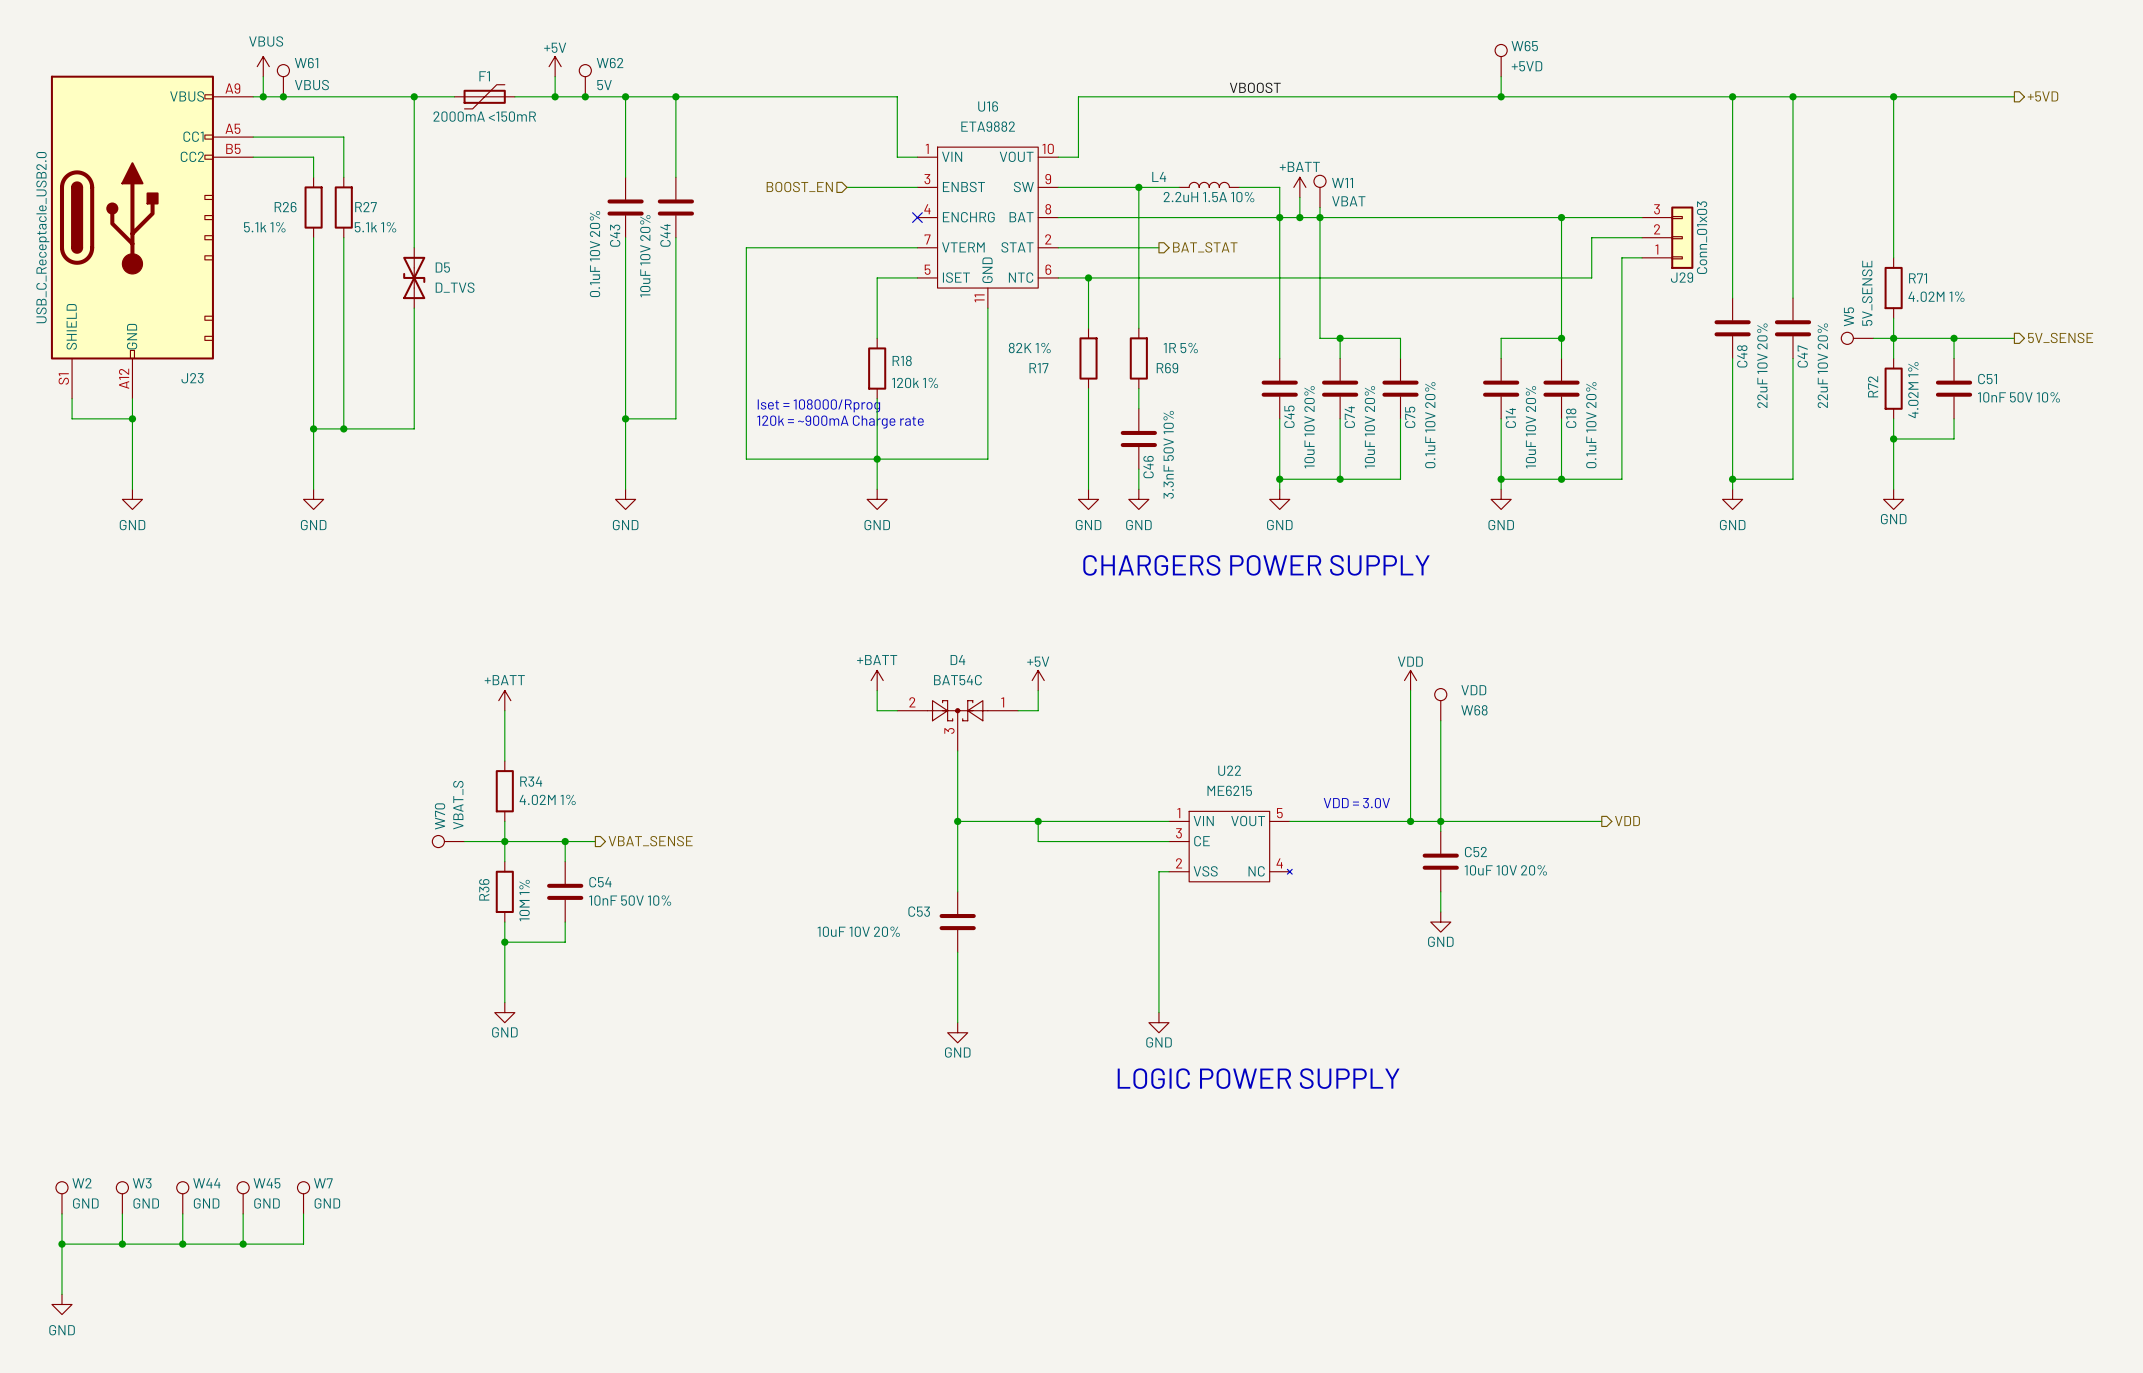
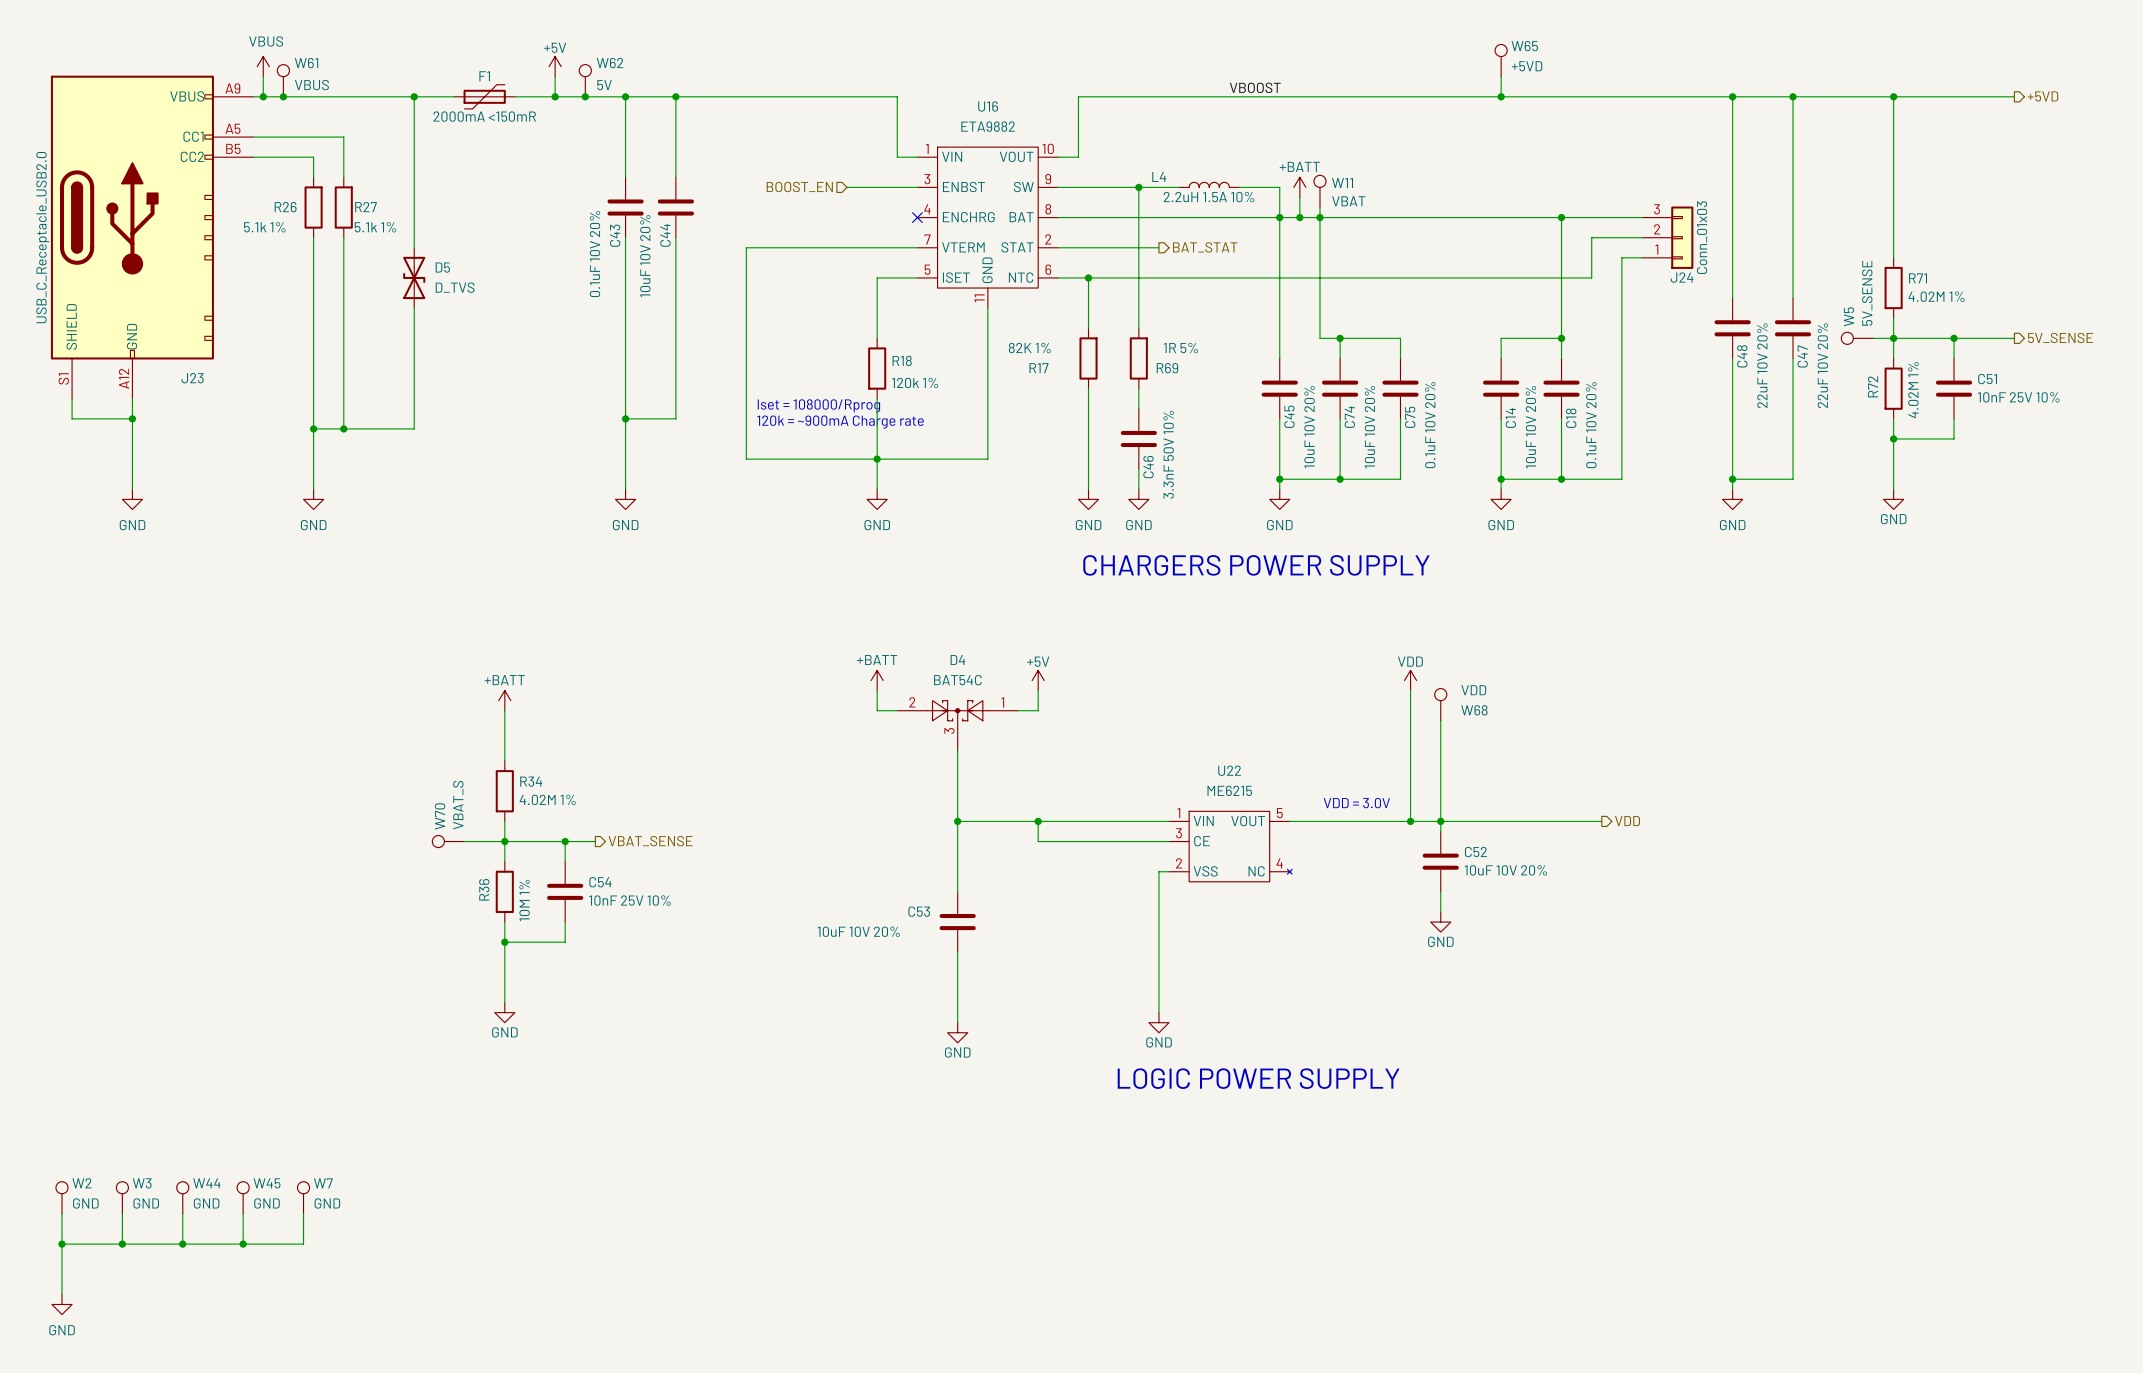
J29 name: J29 (1682, 277) -> J24 (1682, 277)
C51 value: 10nF 50V 10% (2018, 397) -> 10nF 25V 10% (2018, 397)
C54 value: 10nF 50V 10% (630, 900) -> 10nF 25V 10% (629, 900)

